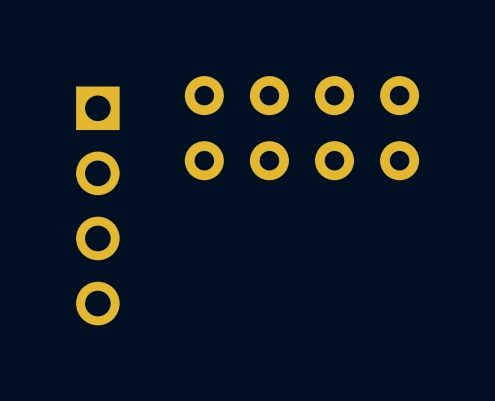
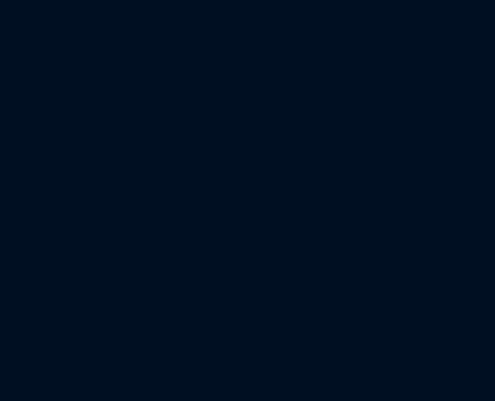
part: (301, 128) -> none
part: (97, 205) -> none

